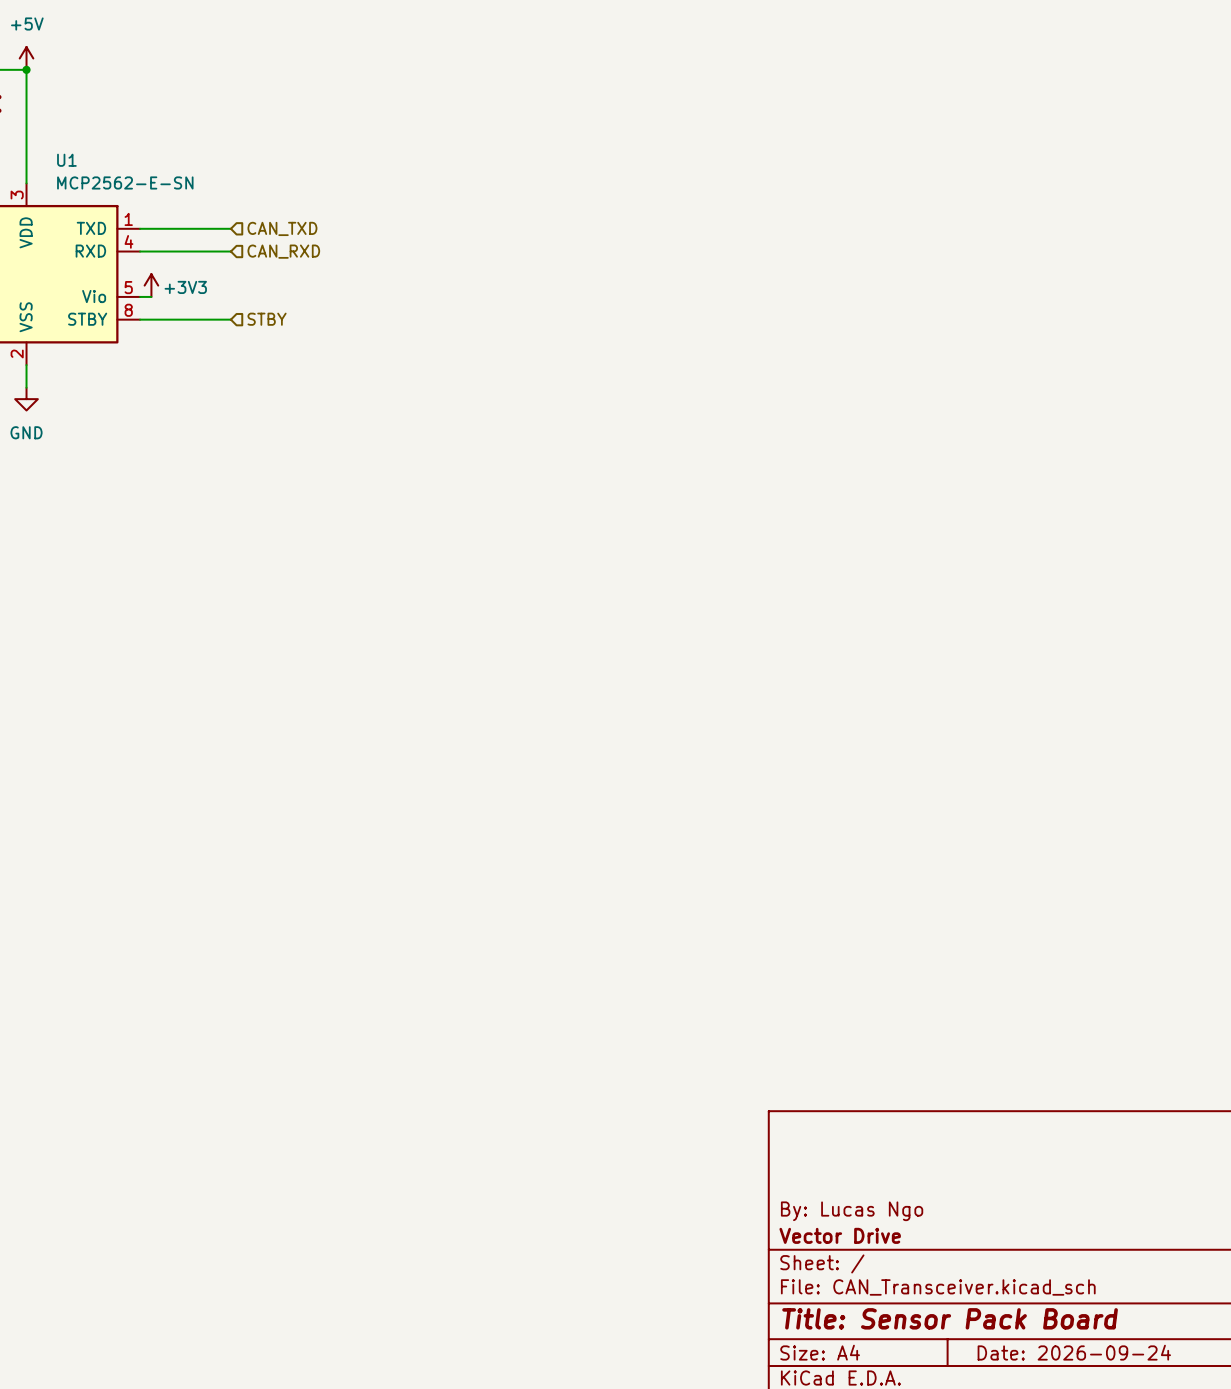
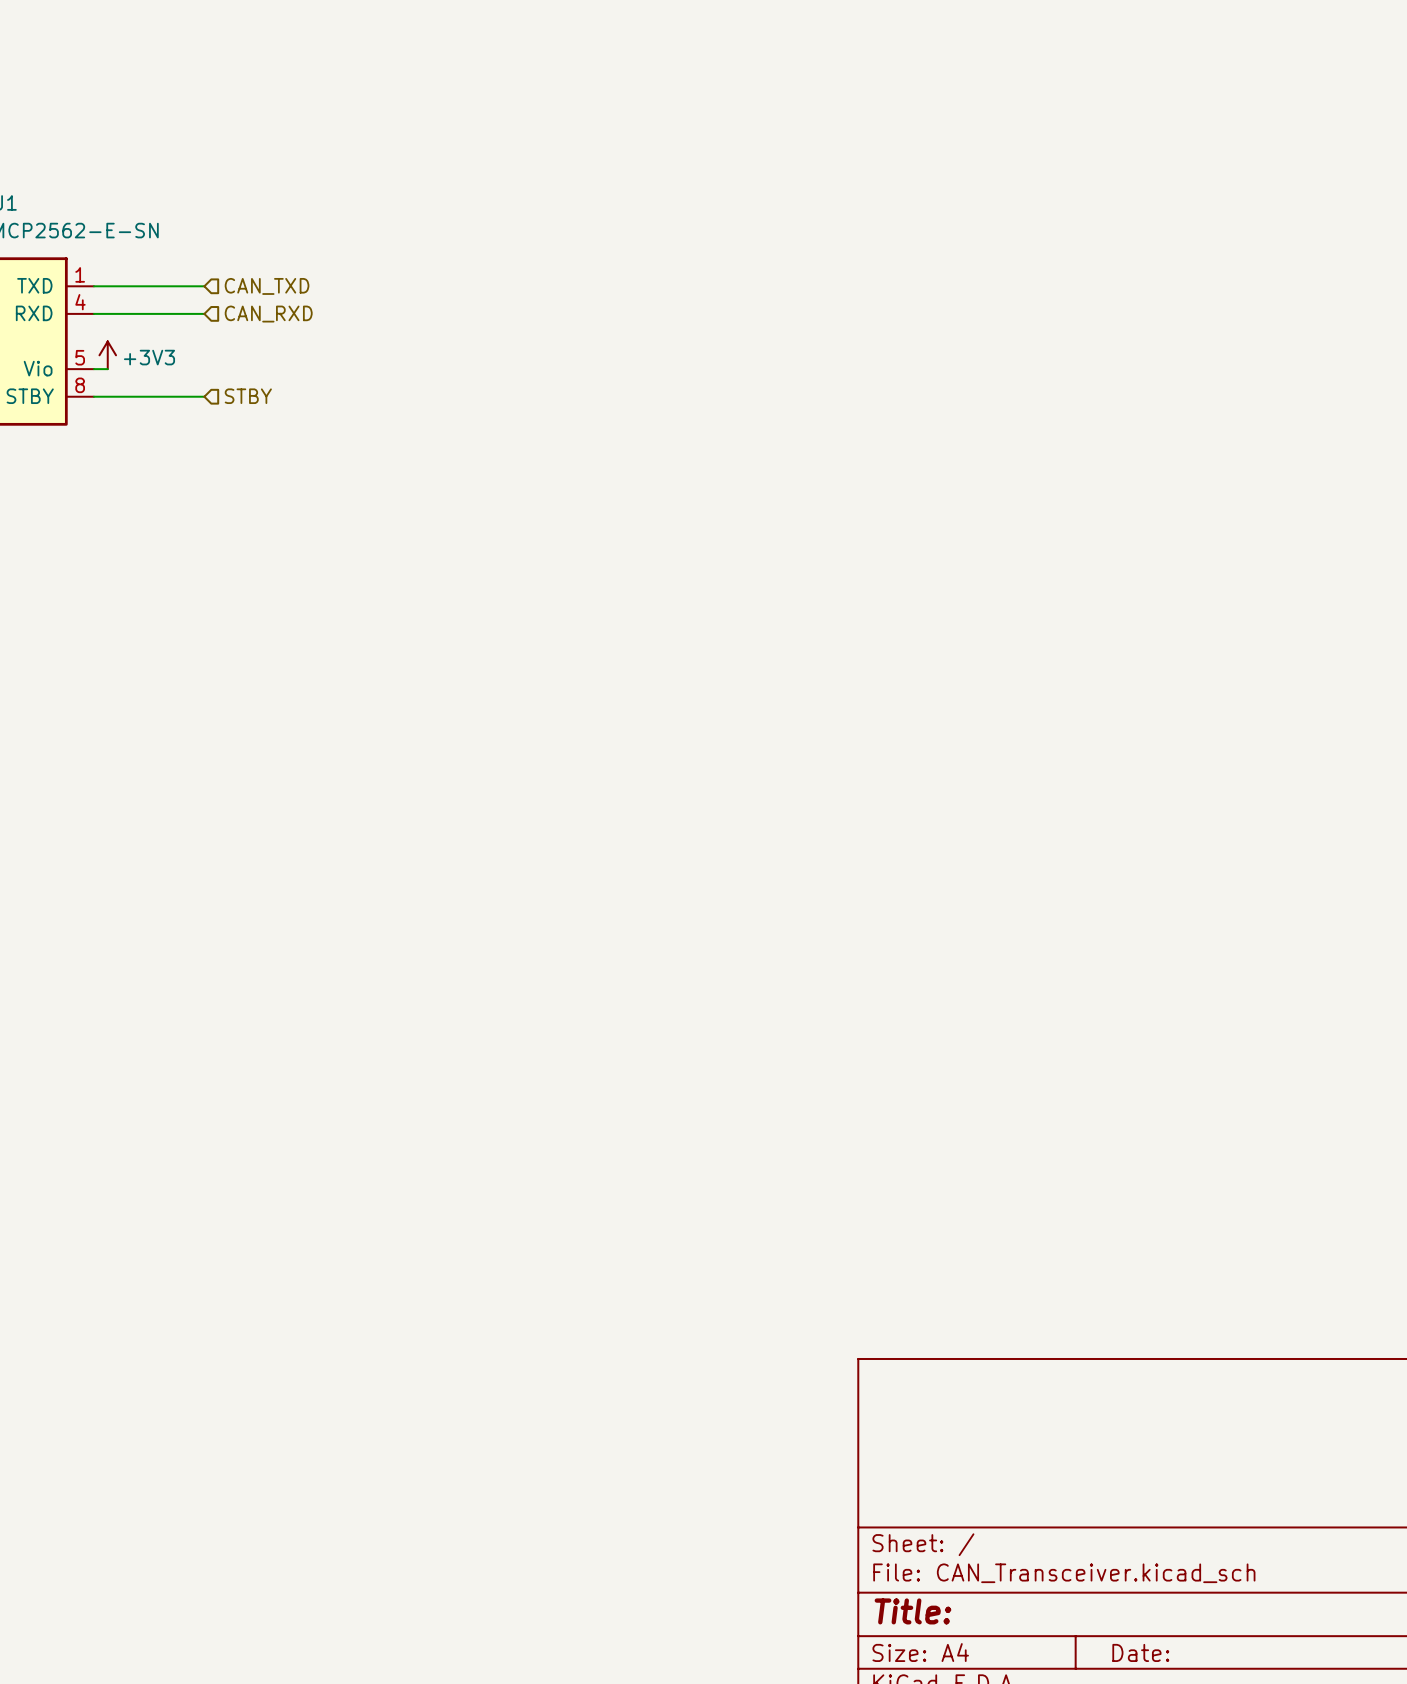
title block: By: Lucas Ngo (852, 1211) -> none
title block: Vector Drive (840, 1235) -> none
title block: Title: Sensor Pack Board (950, 1318) -> Title: (912, 1611)
title block: Date: 2026-09-24 (1074, 1352) -> Date: (1140, 1652)

